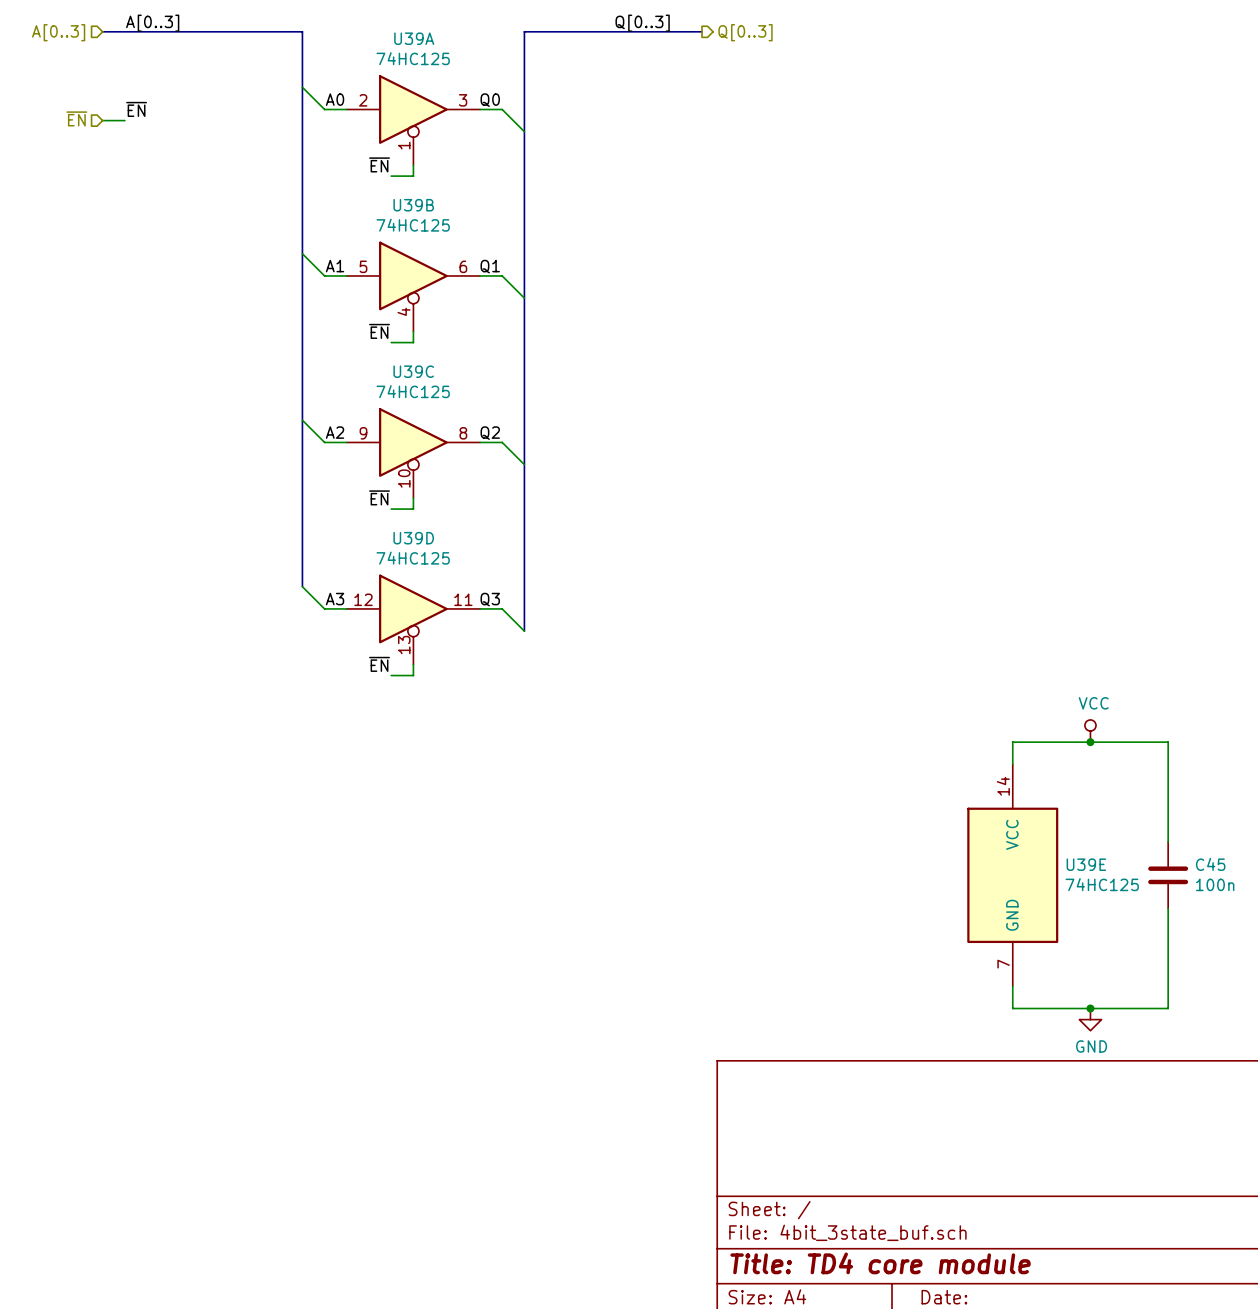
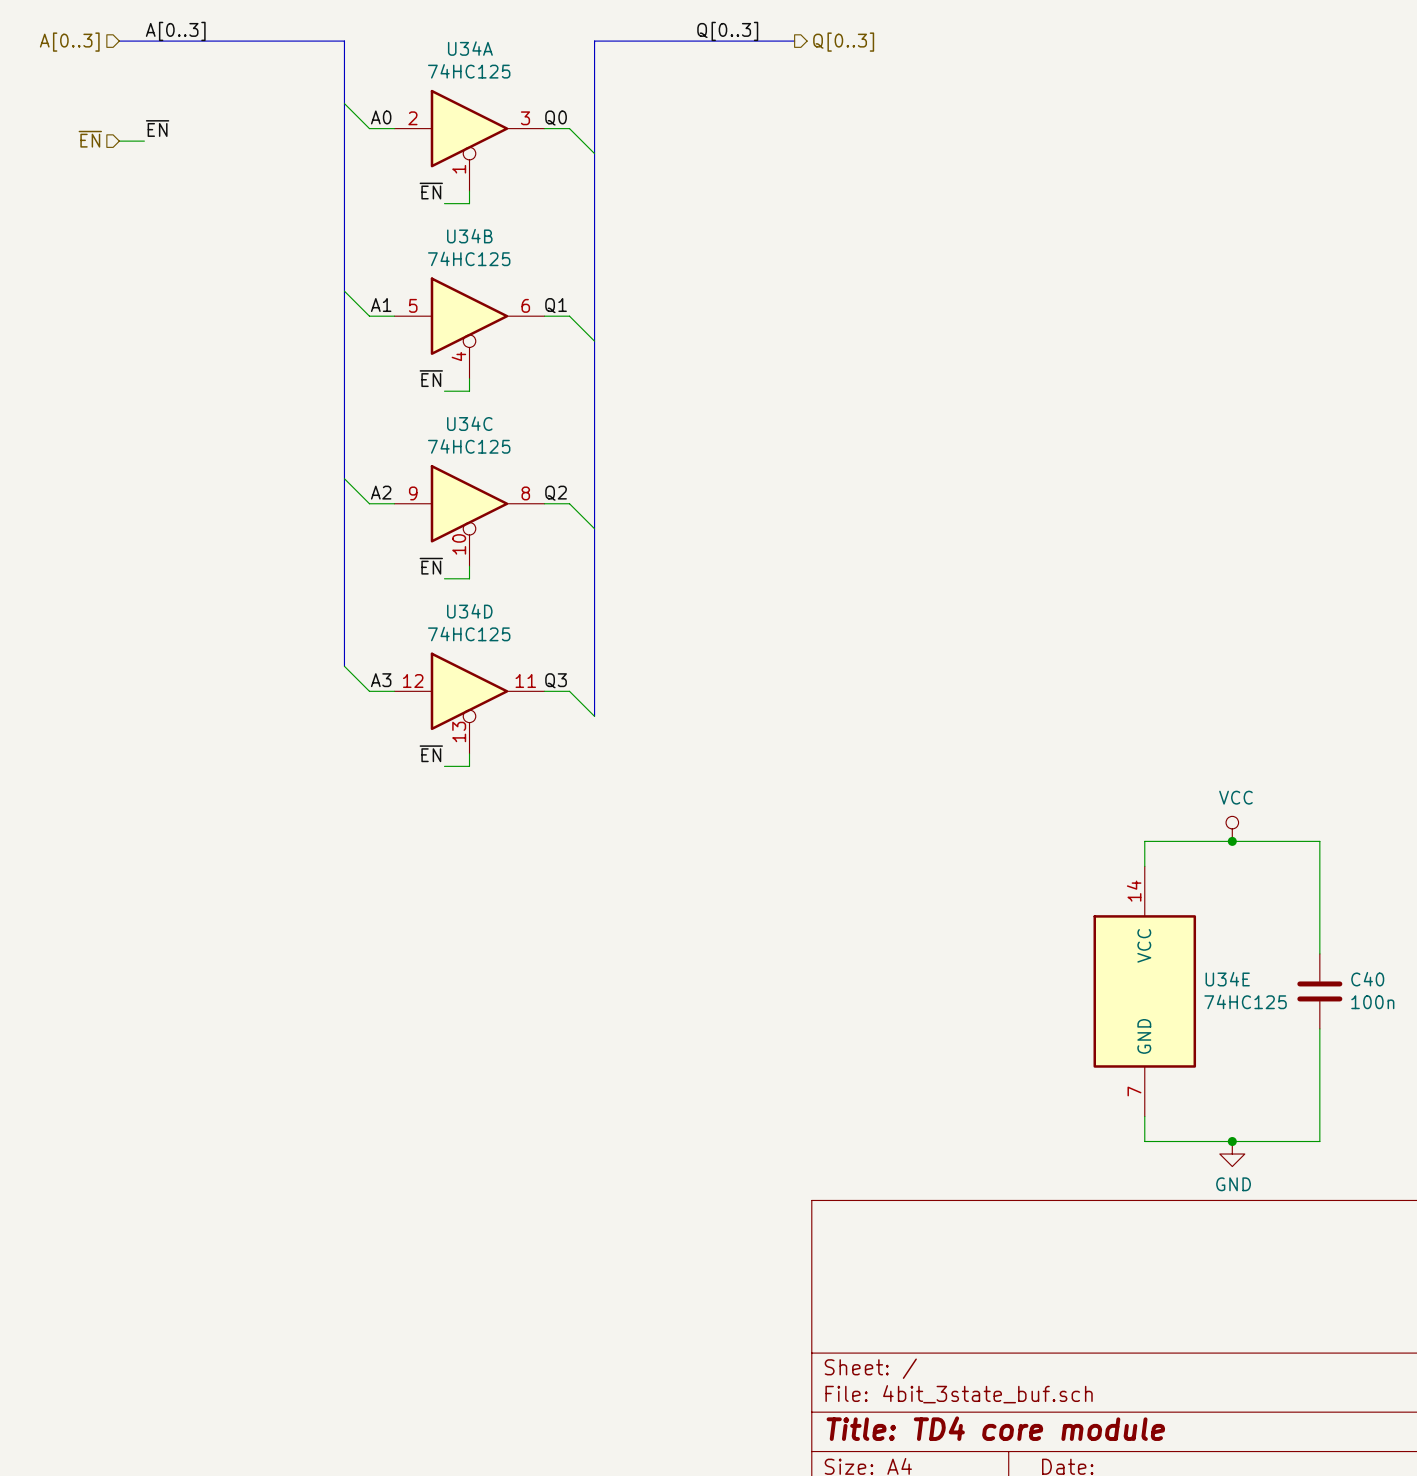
U39A name: U39A (414, 38) -> U34A (470, 48)
U39B name: U39B (413, 205) -> U34B (469, 236)
U39C name: U39C (413, 371) -> U34C (469, 423)
U39D name: U39D (413, 538) -> U34D (469, 611)
U39E name: U39E (1086, 864) -> U34E (1227, 979)
C45 name: C45 (1210, 864) -> C40 (1367, 979)

